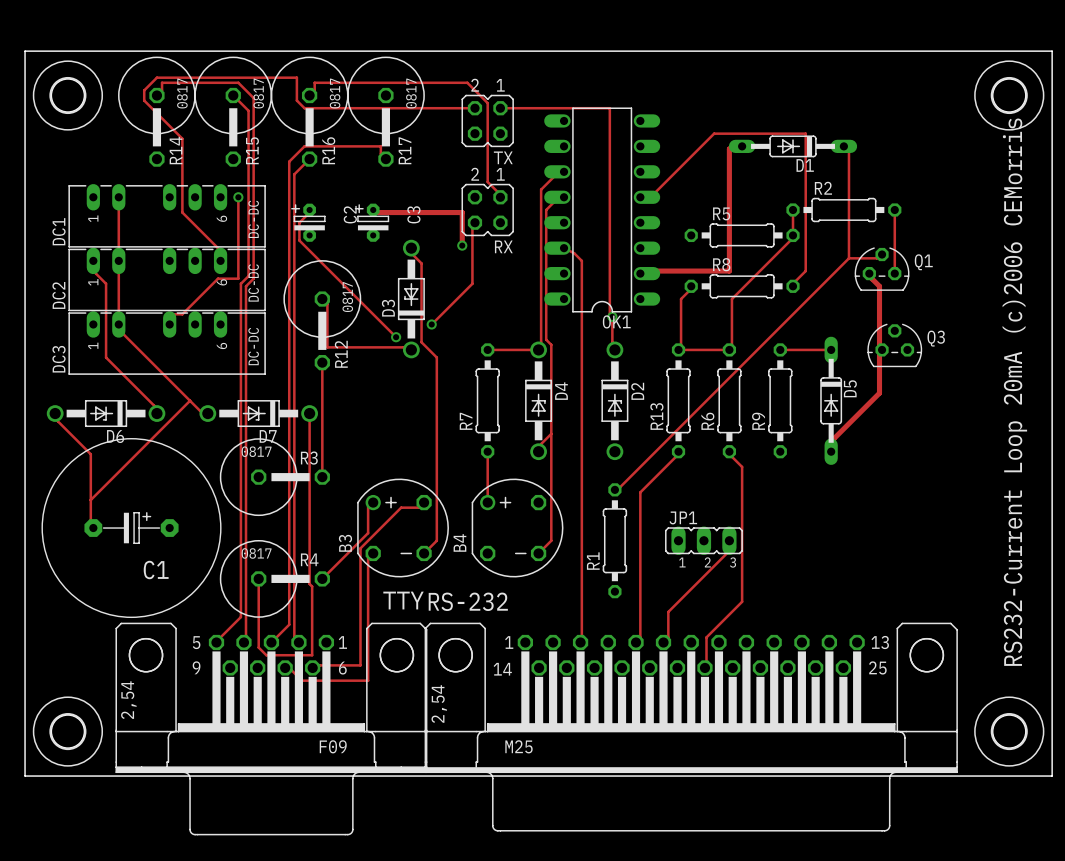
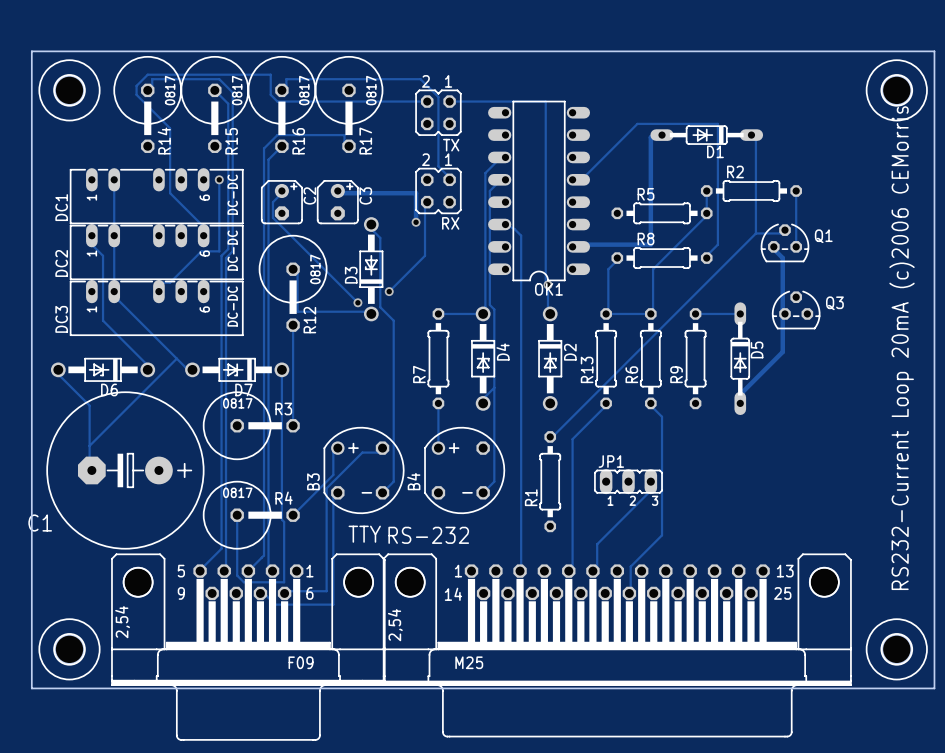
C2 footprint: [291, 203, 326, 242] -> [261, 180, 303, 225]
C3 footprint: [354, 203, 390, 242] -> [317, 180, 359, 225]
C1 footprint: [41, 438, 222, 618] -> [46, 391, 205, 550]
C1 name position: C1 (156, 570) -> C1 (40, 523)

